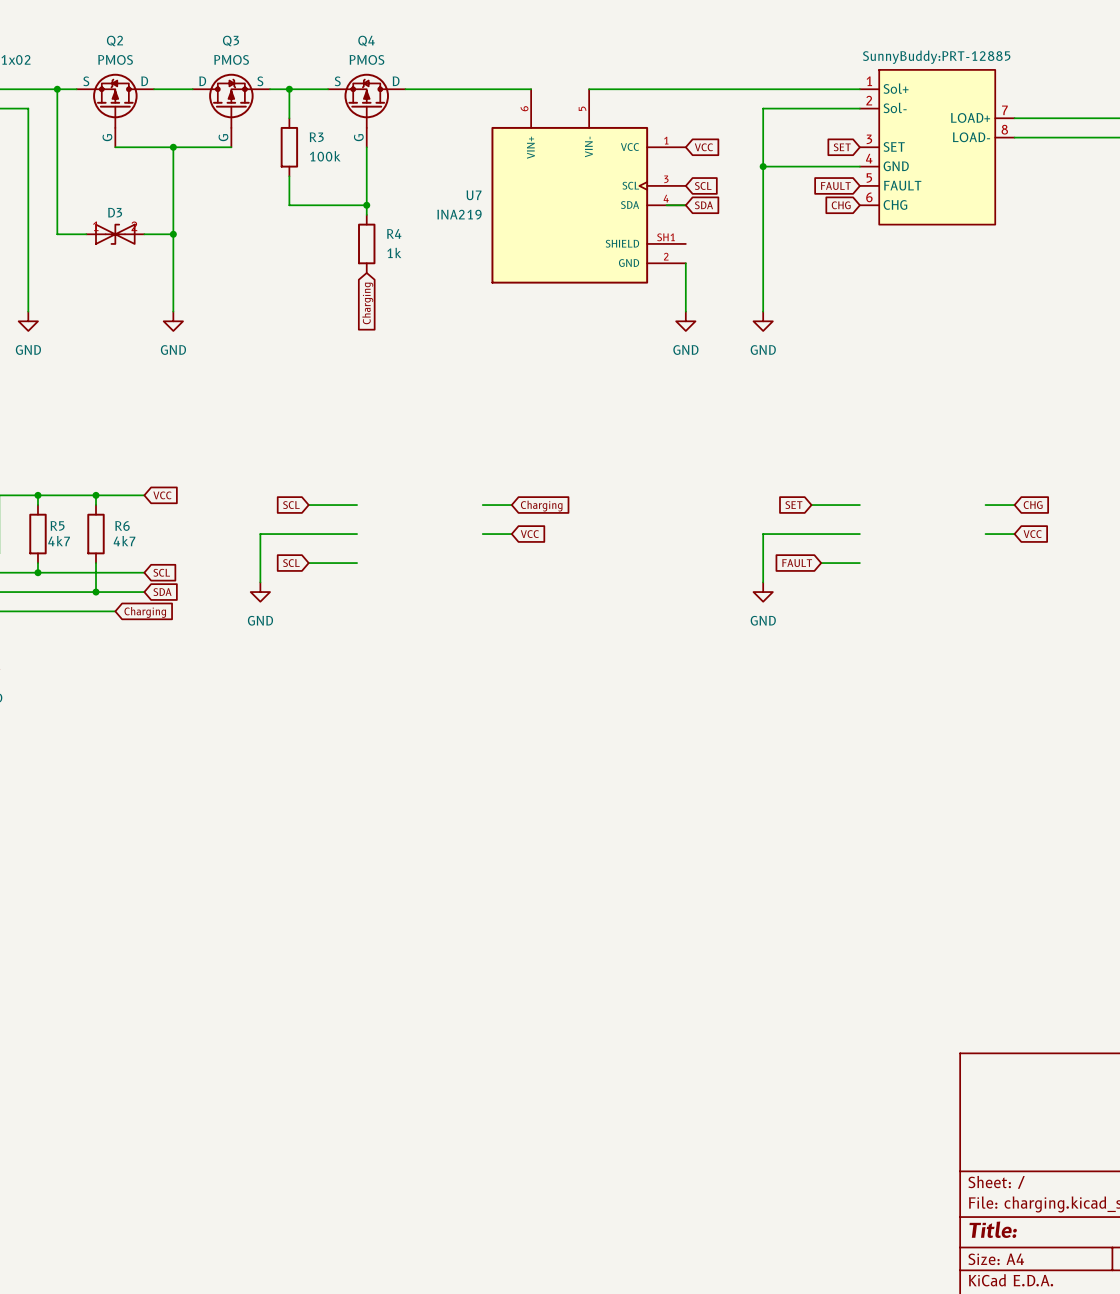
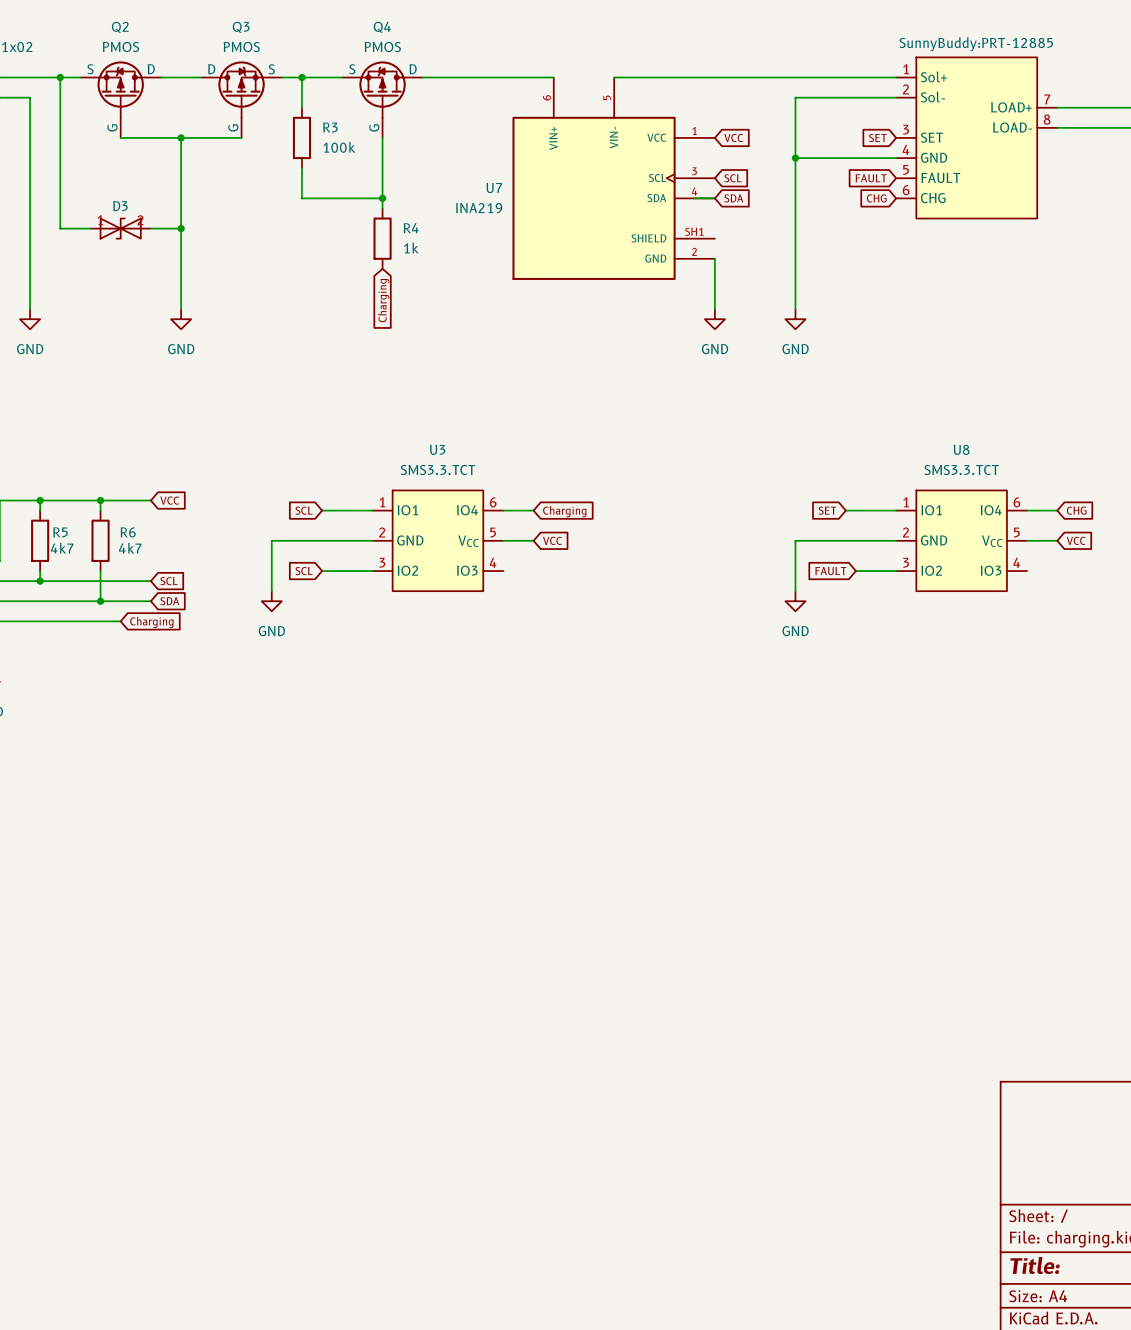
U3: none -> SMS3.3.TCT (437, 540)
U8: none -> SMS3.3.TCT (961, 540)

